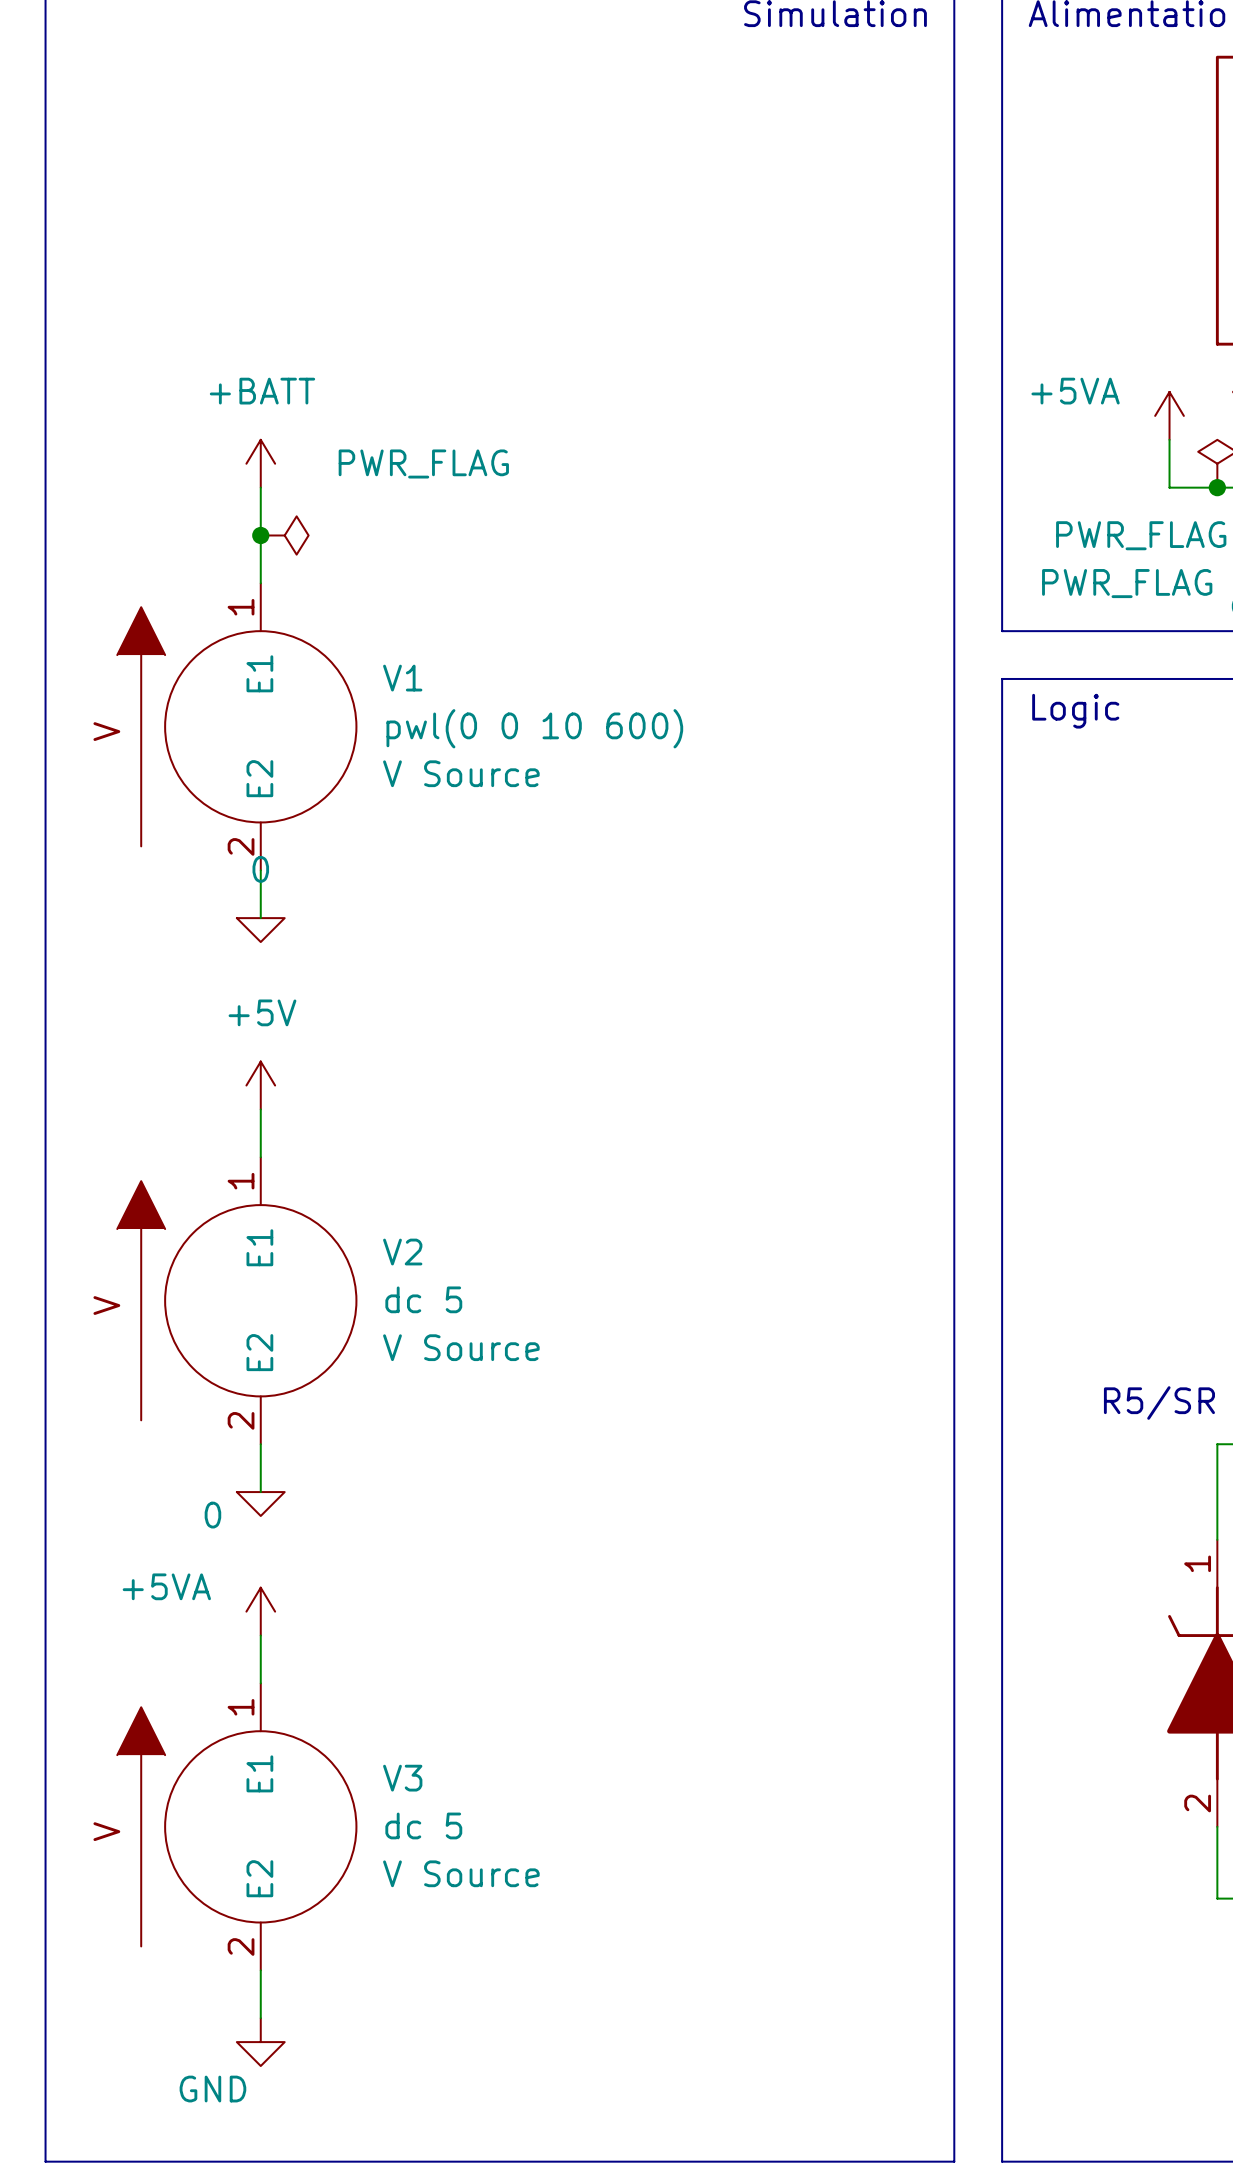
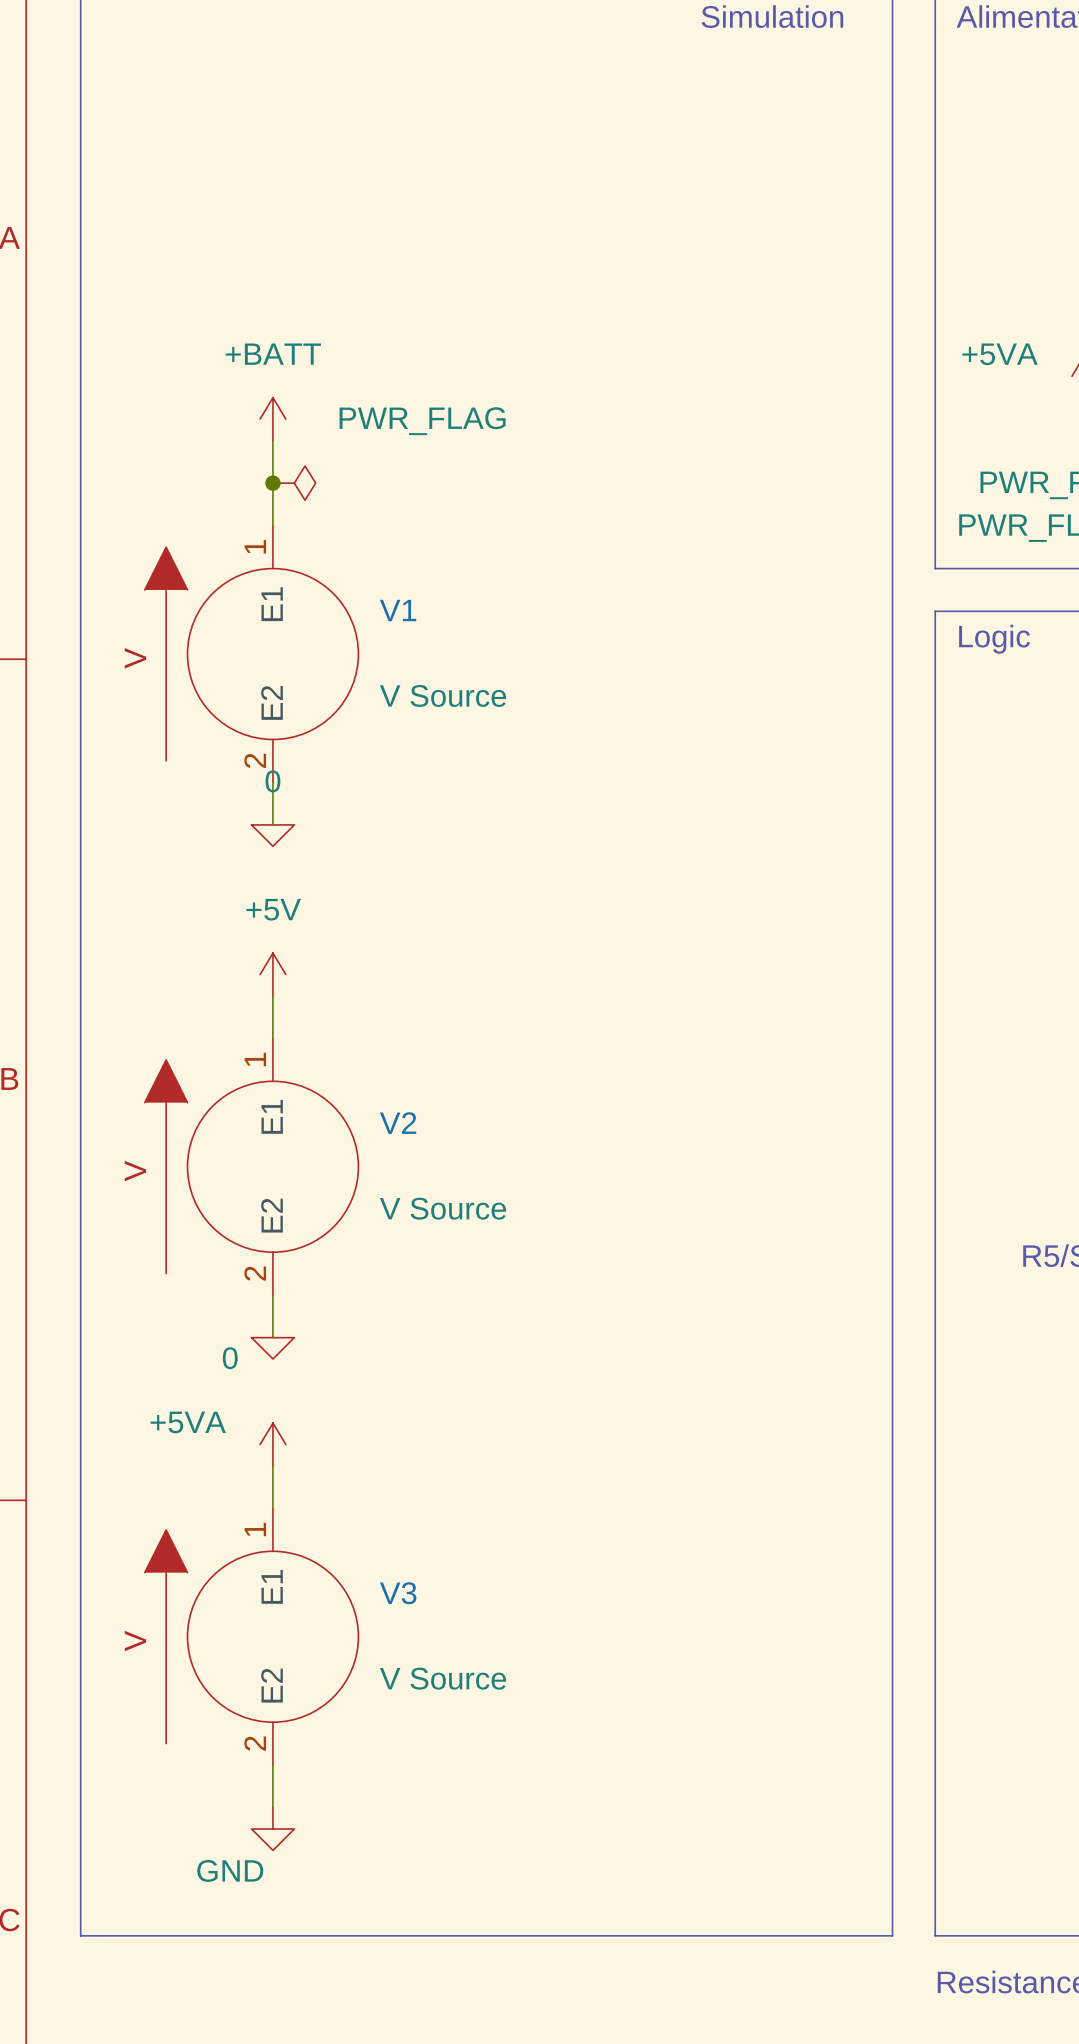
V1 text: pwl(0 0 10 600) (534, 728) -> none
V2 text: dc 5 (423, 1299) -> none
V3 text: dc 5 (423, 1825) -> none

